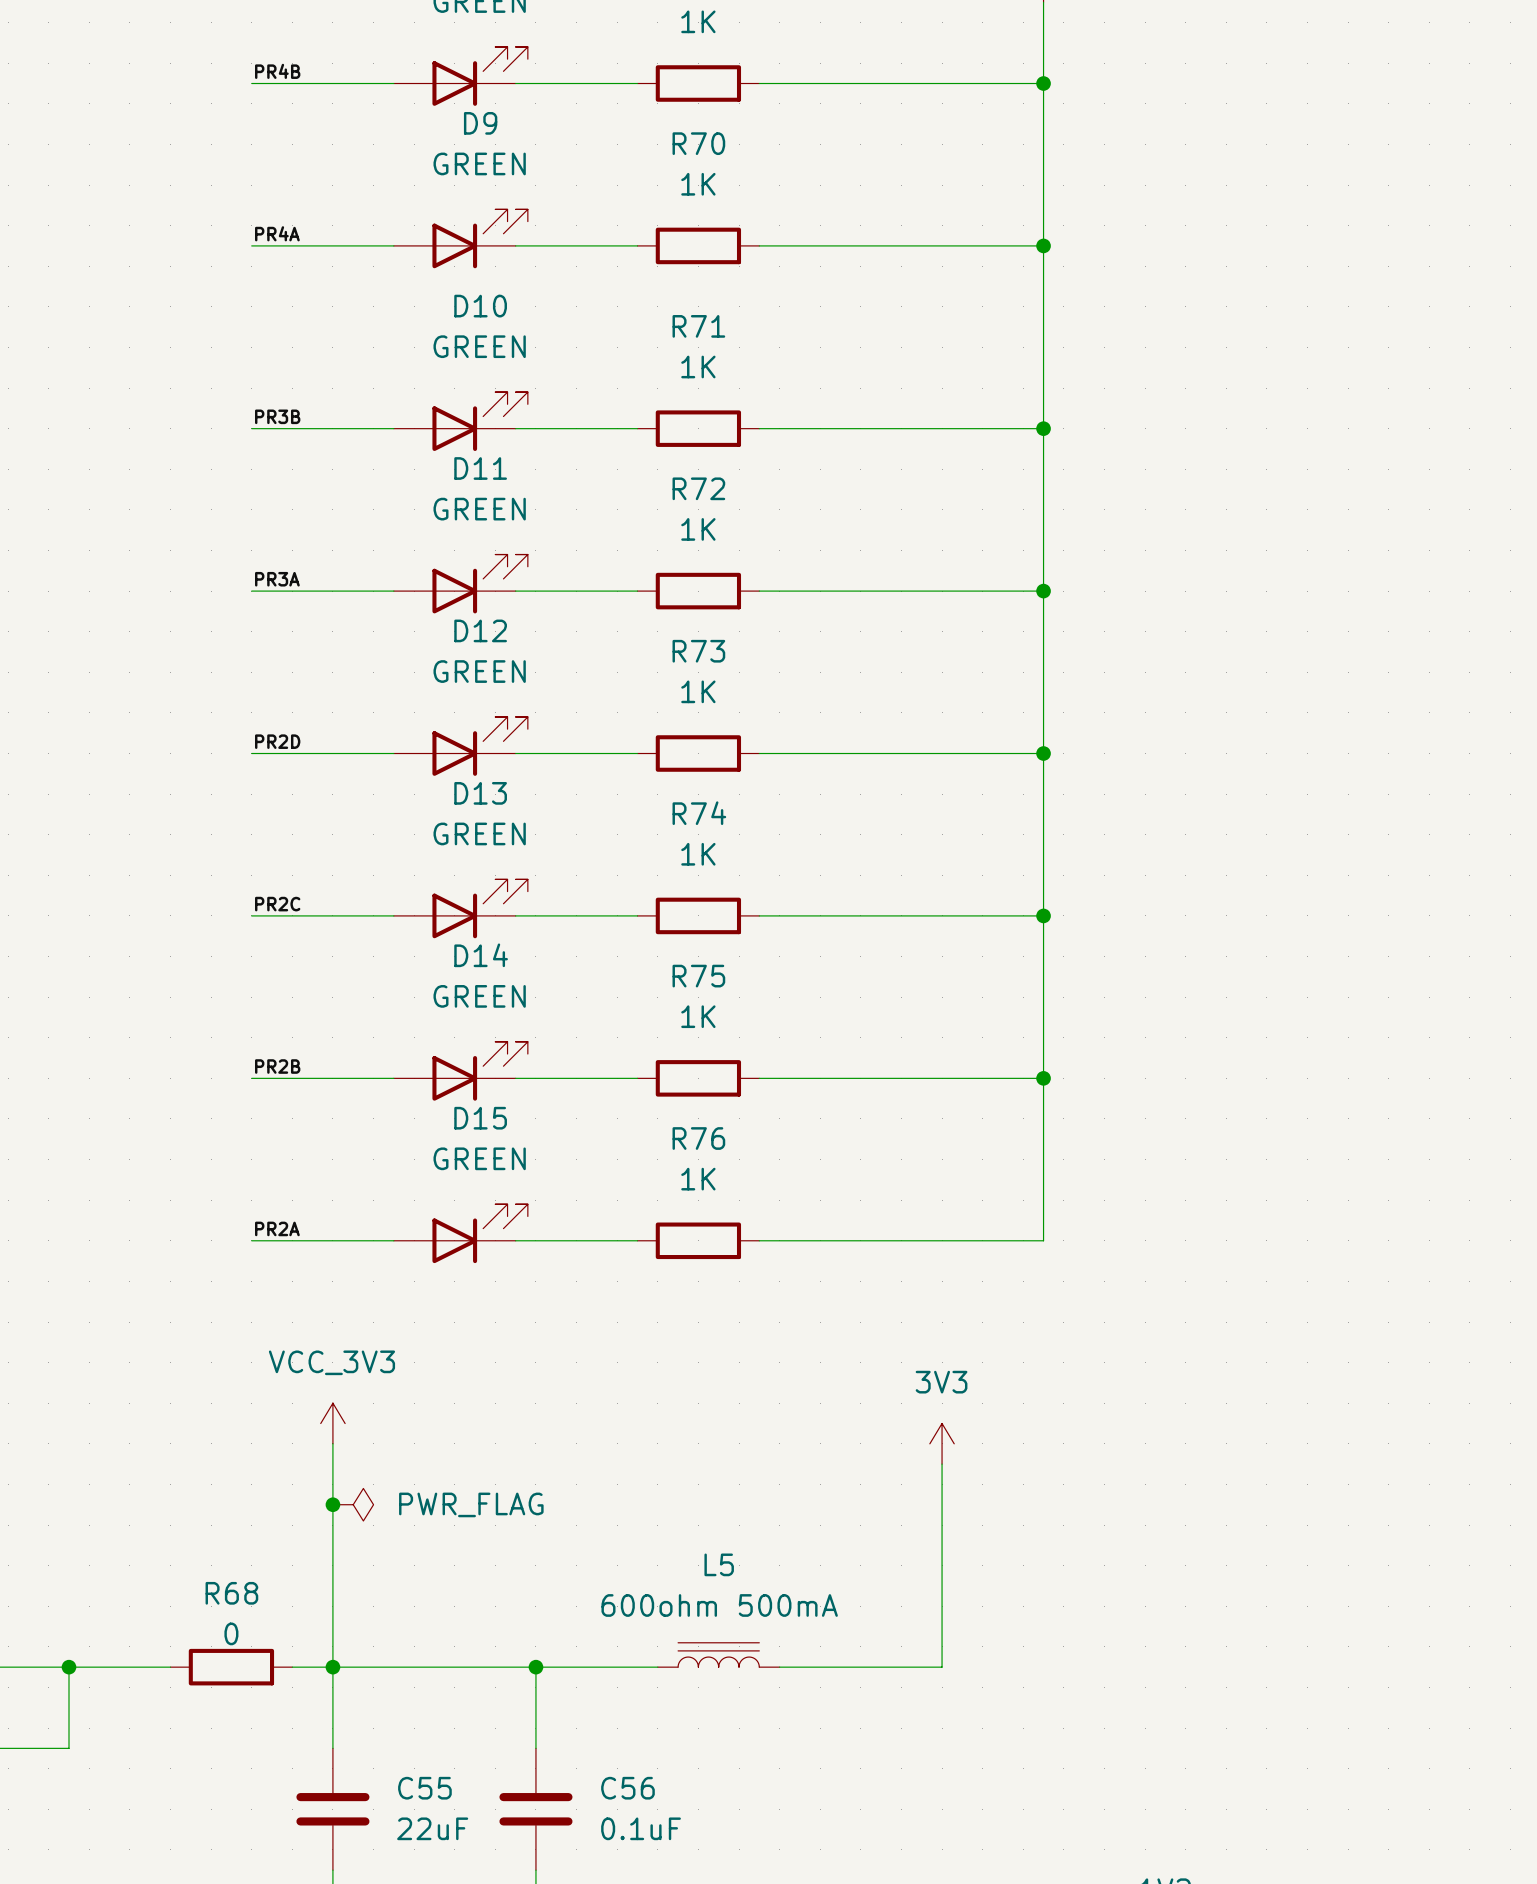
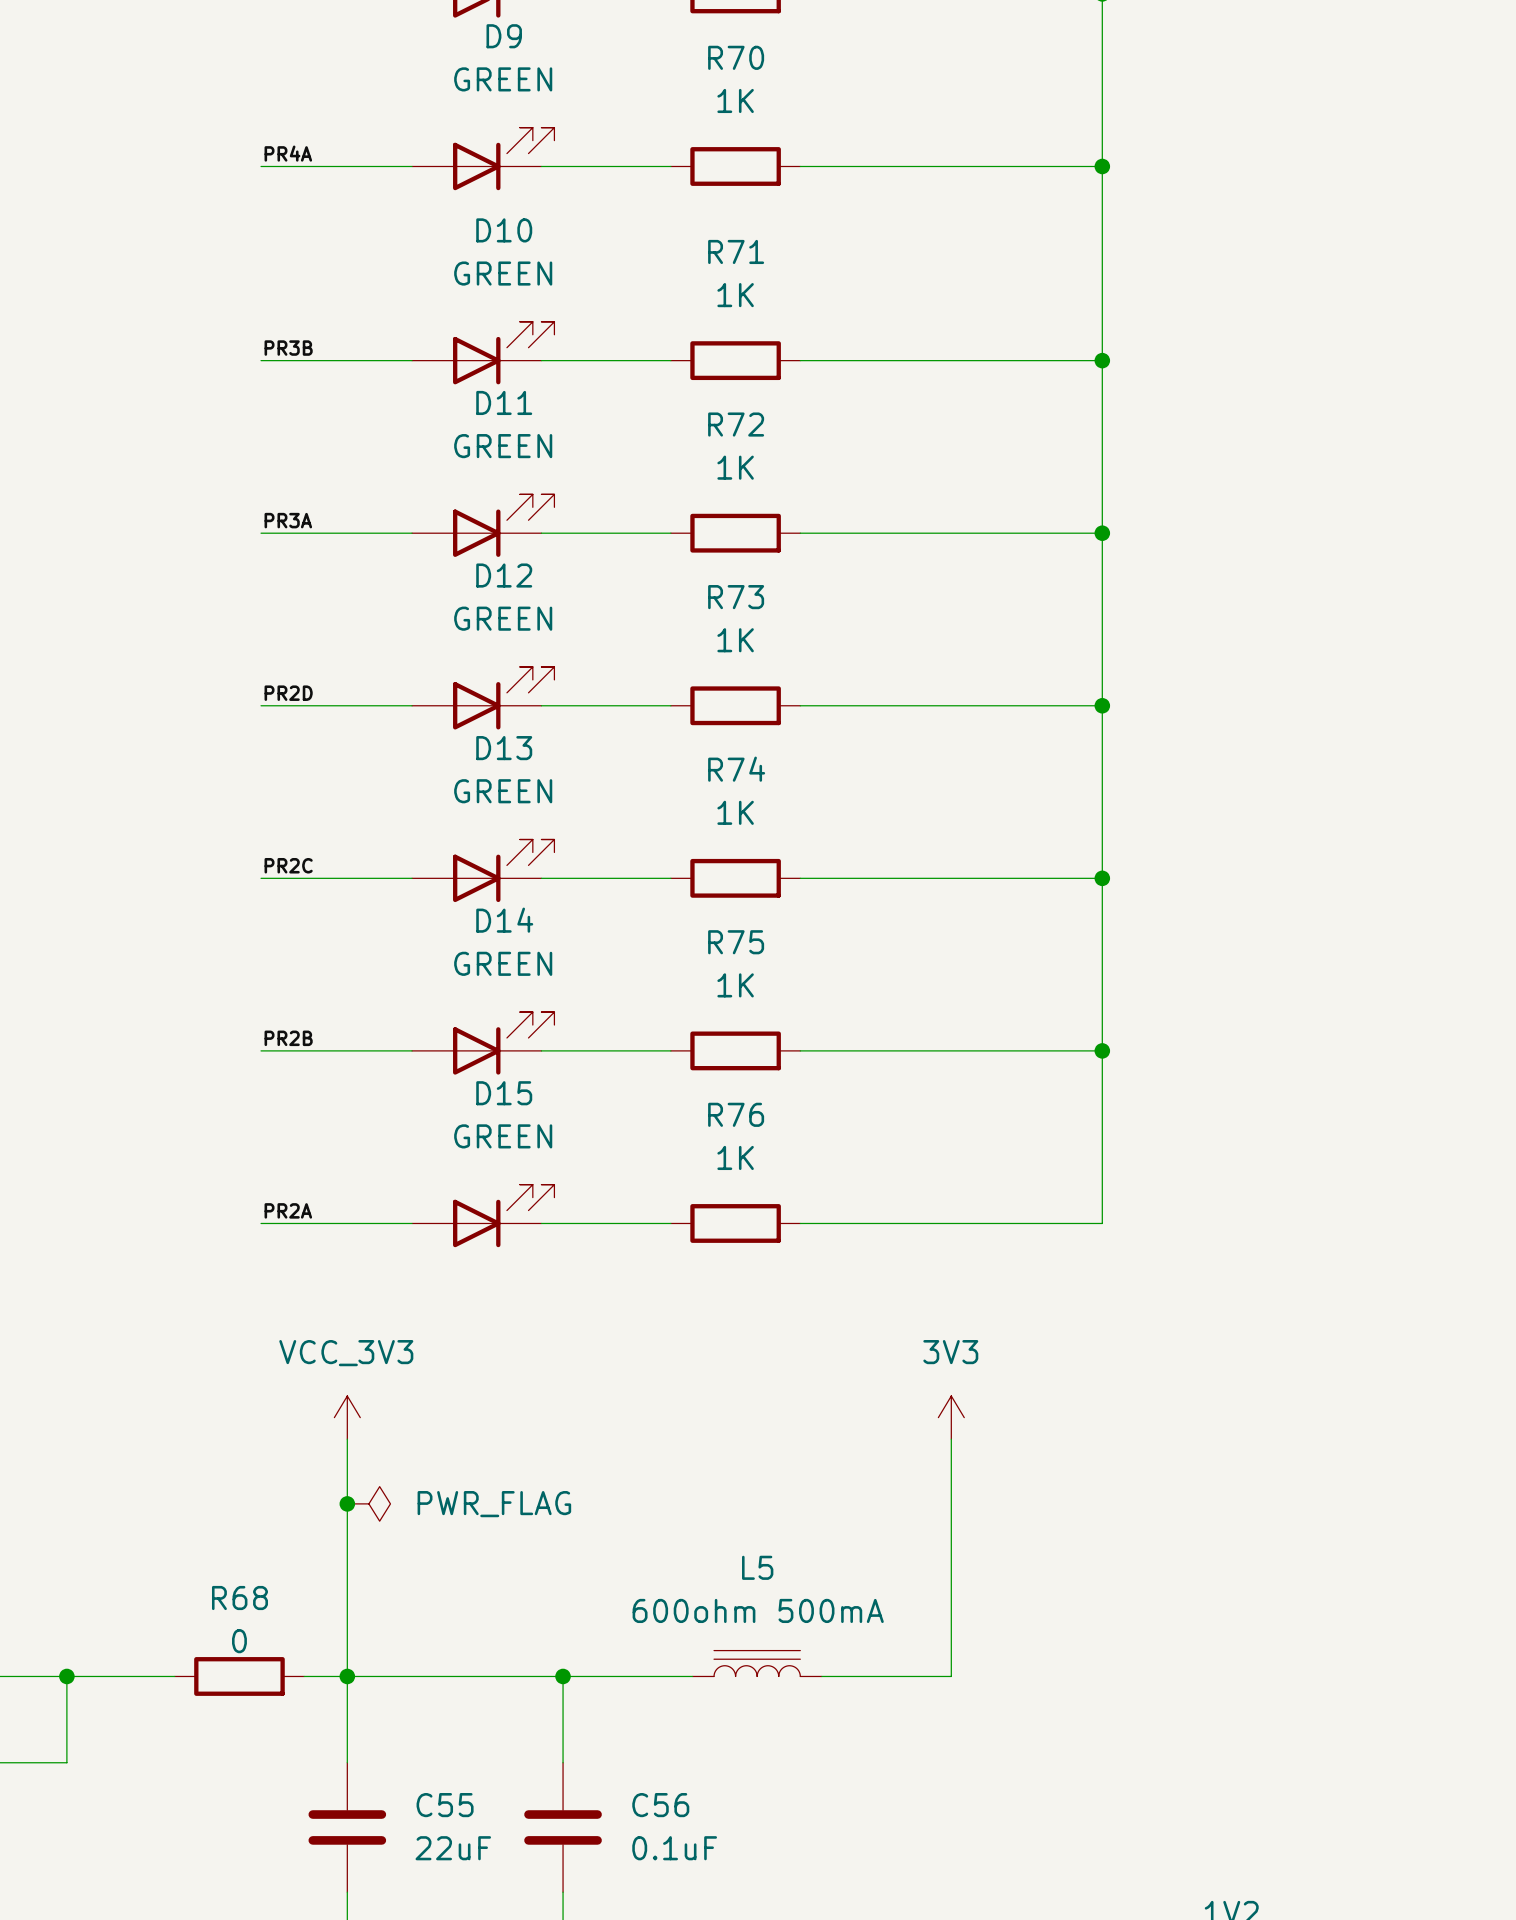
power symbol position: 3V3 (942, 1443) -> 3V3 (951, 1417)
wire: (942, 1464) (942, 1667) (901, 1667) -> (951, 1439) (951, 1676)

